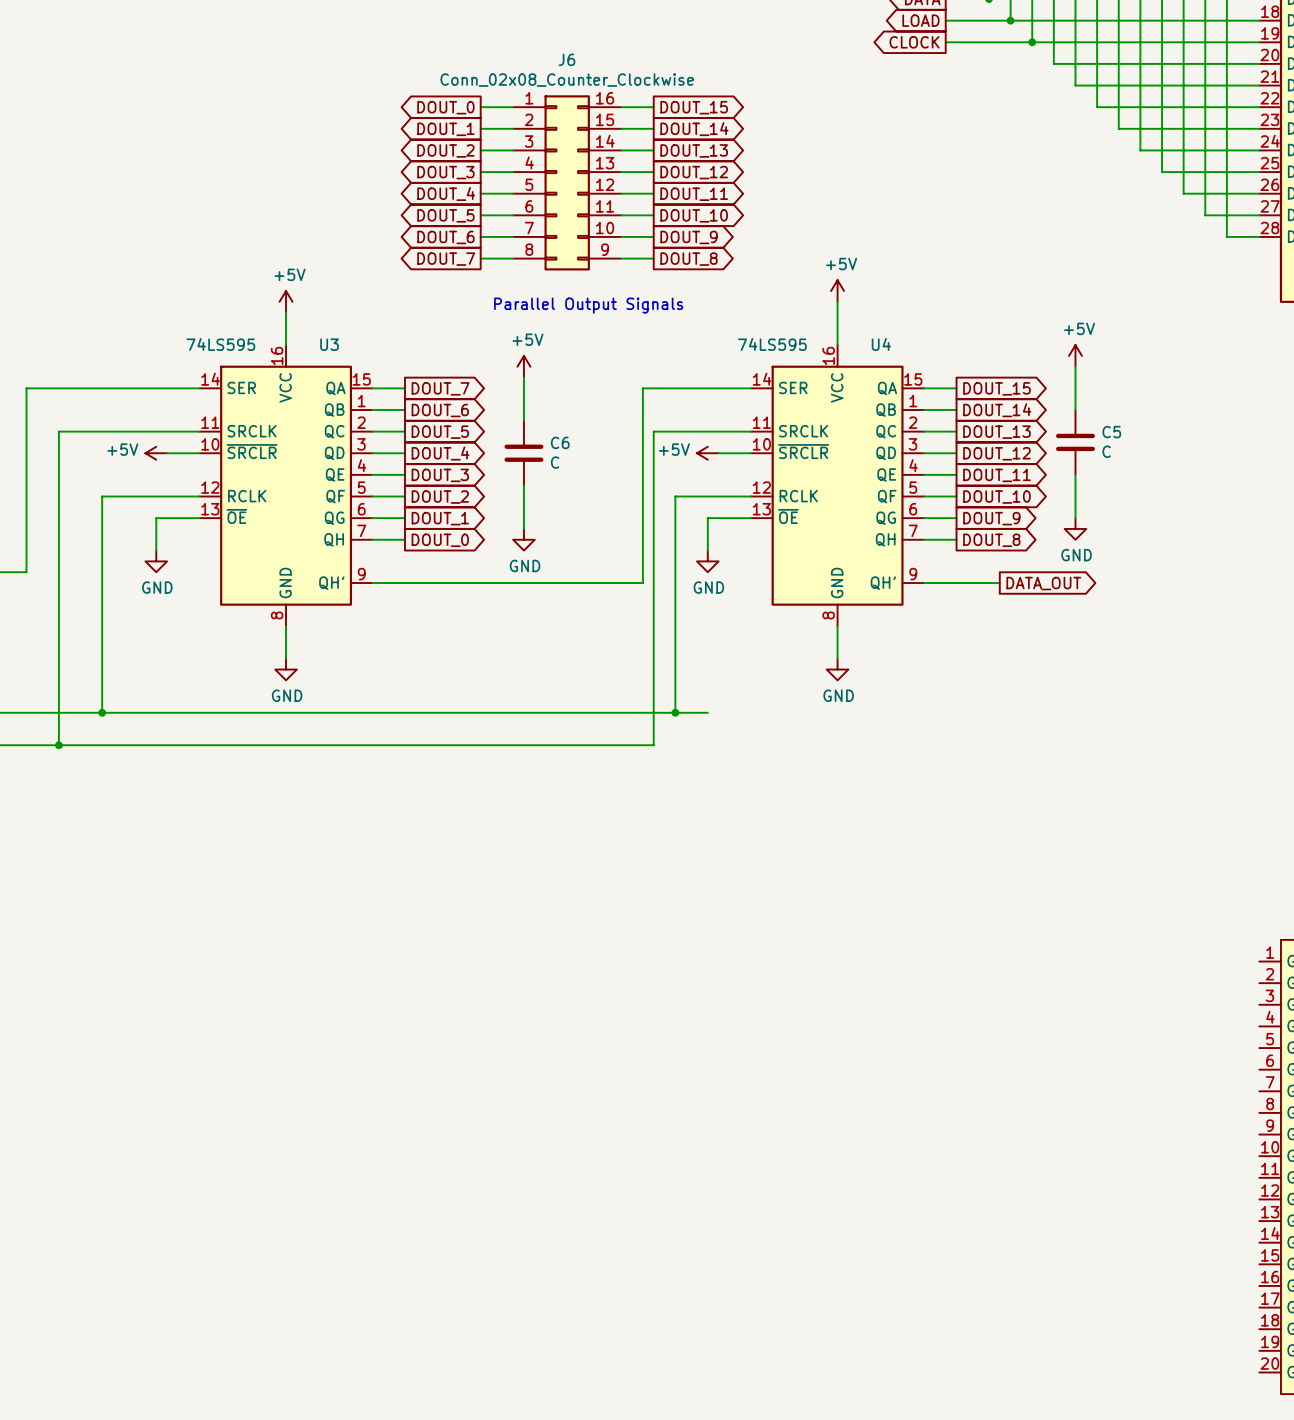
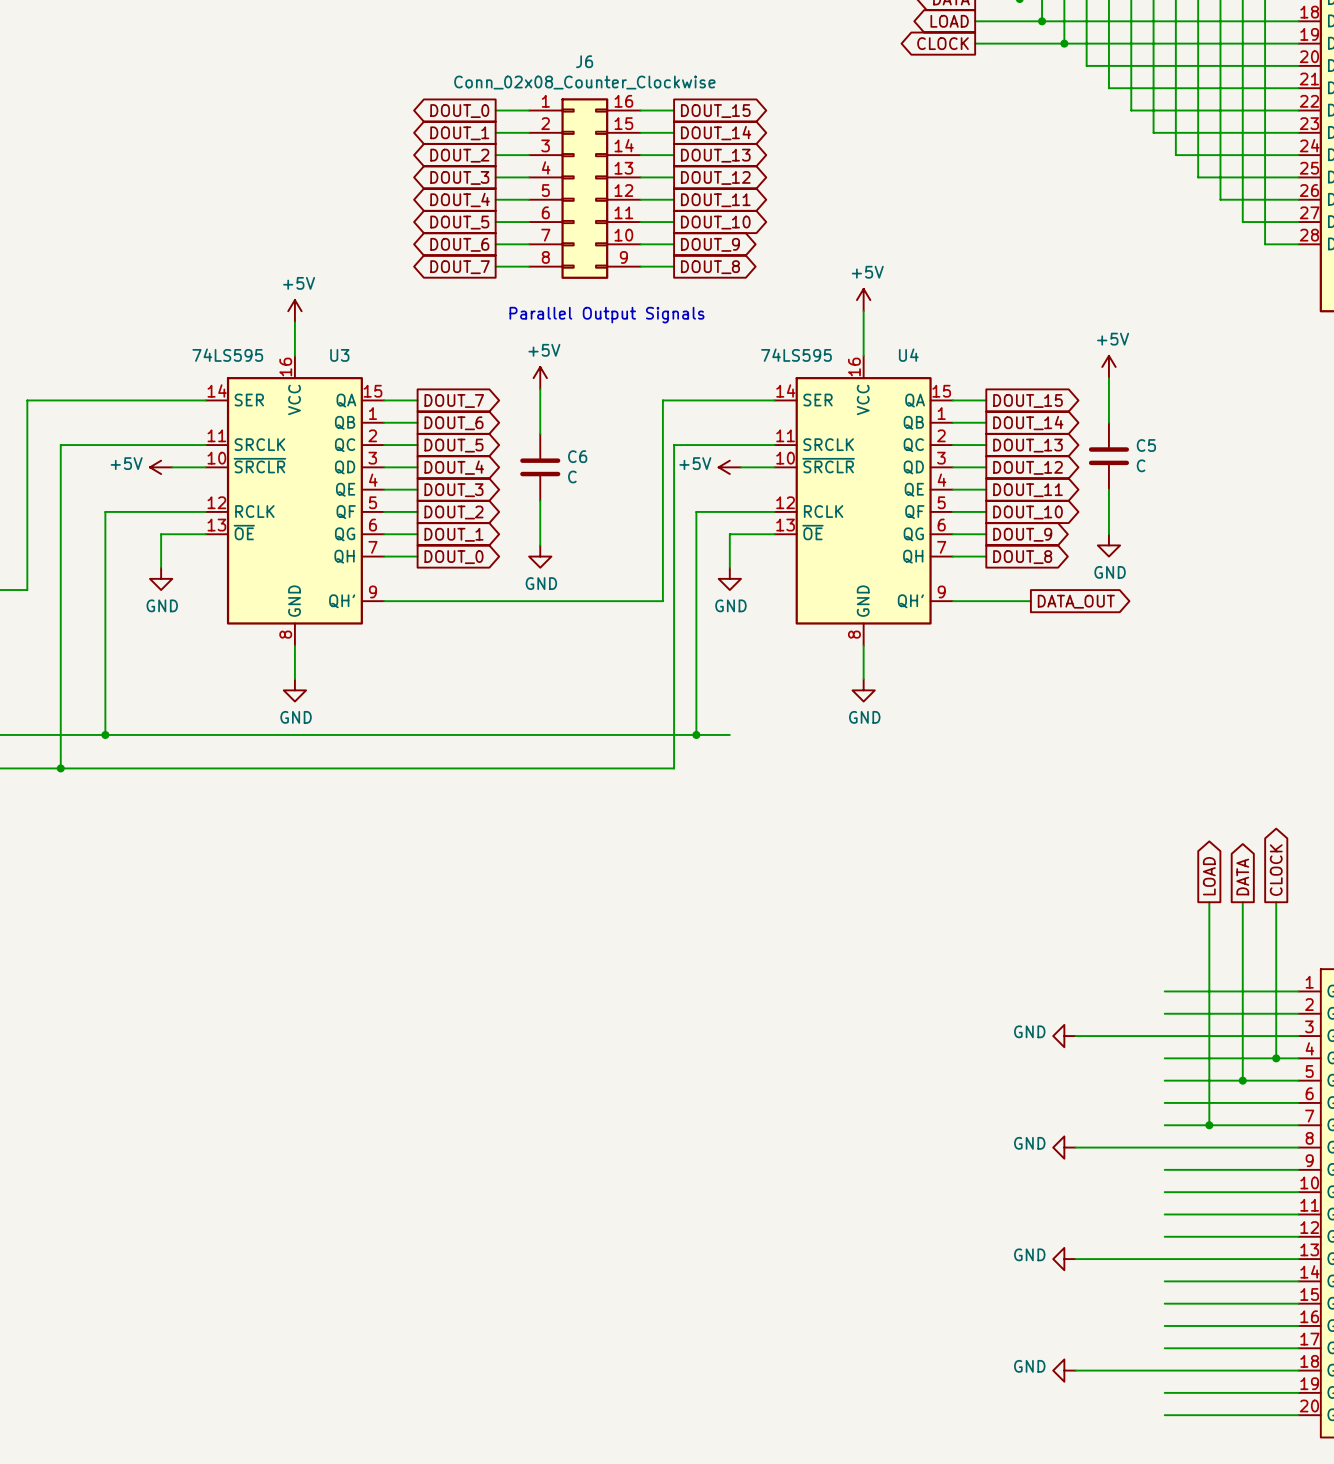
global label: none -> CLOCK (1276, 870)
global label: none -> LOAD (1209, 876)
global label: none -> DATA (1242, 877)
wire: none -> (1209, 902) (1209, 1125)
wire: none -> (1242, 902) (1242, 1080)
wire: none -> (1276, 902) (1276, 1058)
wire: none -> (1164, 991) (1298, 991)
wire: none -> (1164, 1013) (1298, 1013)
power symbol: none -> GND (1064, 1036)
wire: none -> (1075, 1036) (1298, 1036)
wire: none -> (1164, 1058) (1298, 1058)
junction: none -> (1276, 1058)
wire: none -> (1164, 1080) (1298, 1080)
junction: none -> (1242, 1080)
wire: none -> (1164, 1102) (1298, 1102)
wire: none -> (1164, 1125) (1298, 1125)
junction: none -> (1209, 1125)
power symbol: none -> GND (1064, 1147)
wire: none -> (1075, 1147) (1298, 1147)
wire: none -> (1164, 1169) (1298, 1169)
wire: none -> (1164, 1192) (1298, 1192)
wire: none -> (1164, 1214) (1298, 1214)
wire: none -> (1164, 1236) (1298, 1236)
power symbol: none -> GND (1064, 1259)
wire: none -> (1075, 1259) (1298, 1259)
wire: none -> (1164, 1281) (1298, 1281)
wire: none -> (1164, 1303) (1298, 1303)
wire: none -> (1164, 1325) (1298, 1325)
wire: none -> (1164, 1348) (1298, 1348)
power symbol: none -> GND (1064, 1370)
wire: none -> (1075, 1370) (1298, 1370)
wire: none -> (1164, 1392) (1298, 1392)
wire: none -> (1164, 1415) (1298, 1415)

